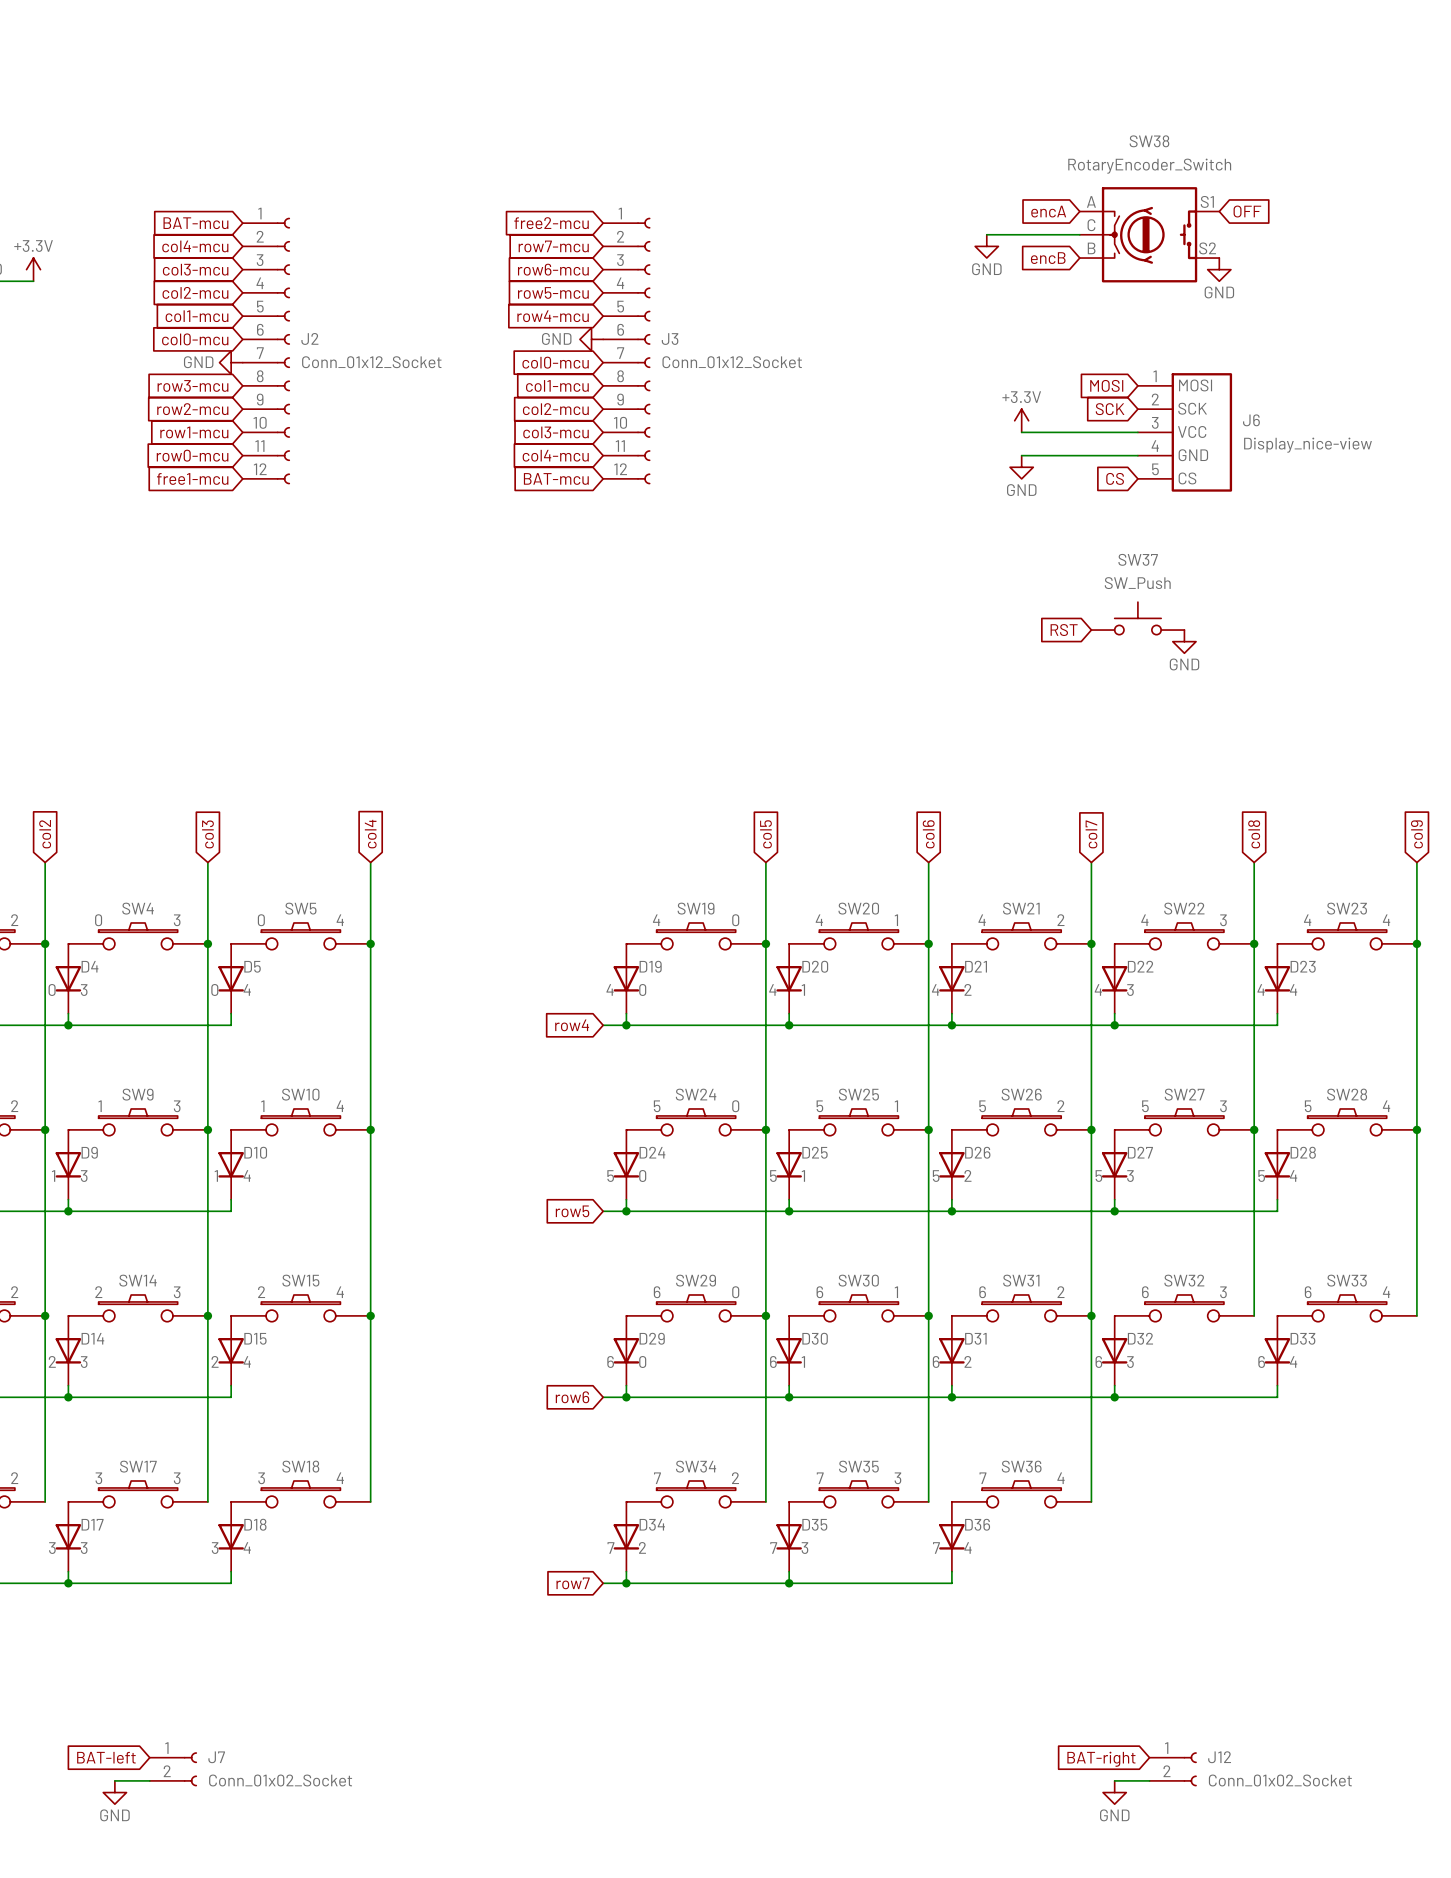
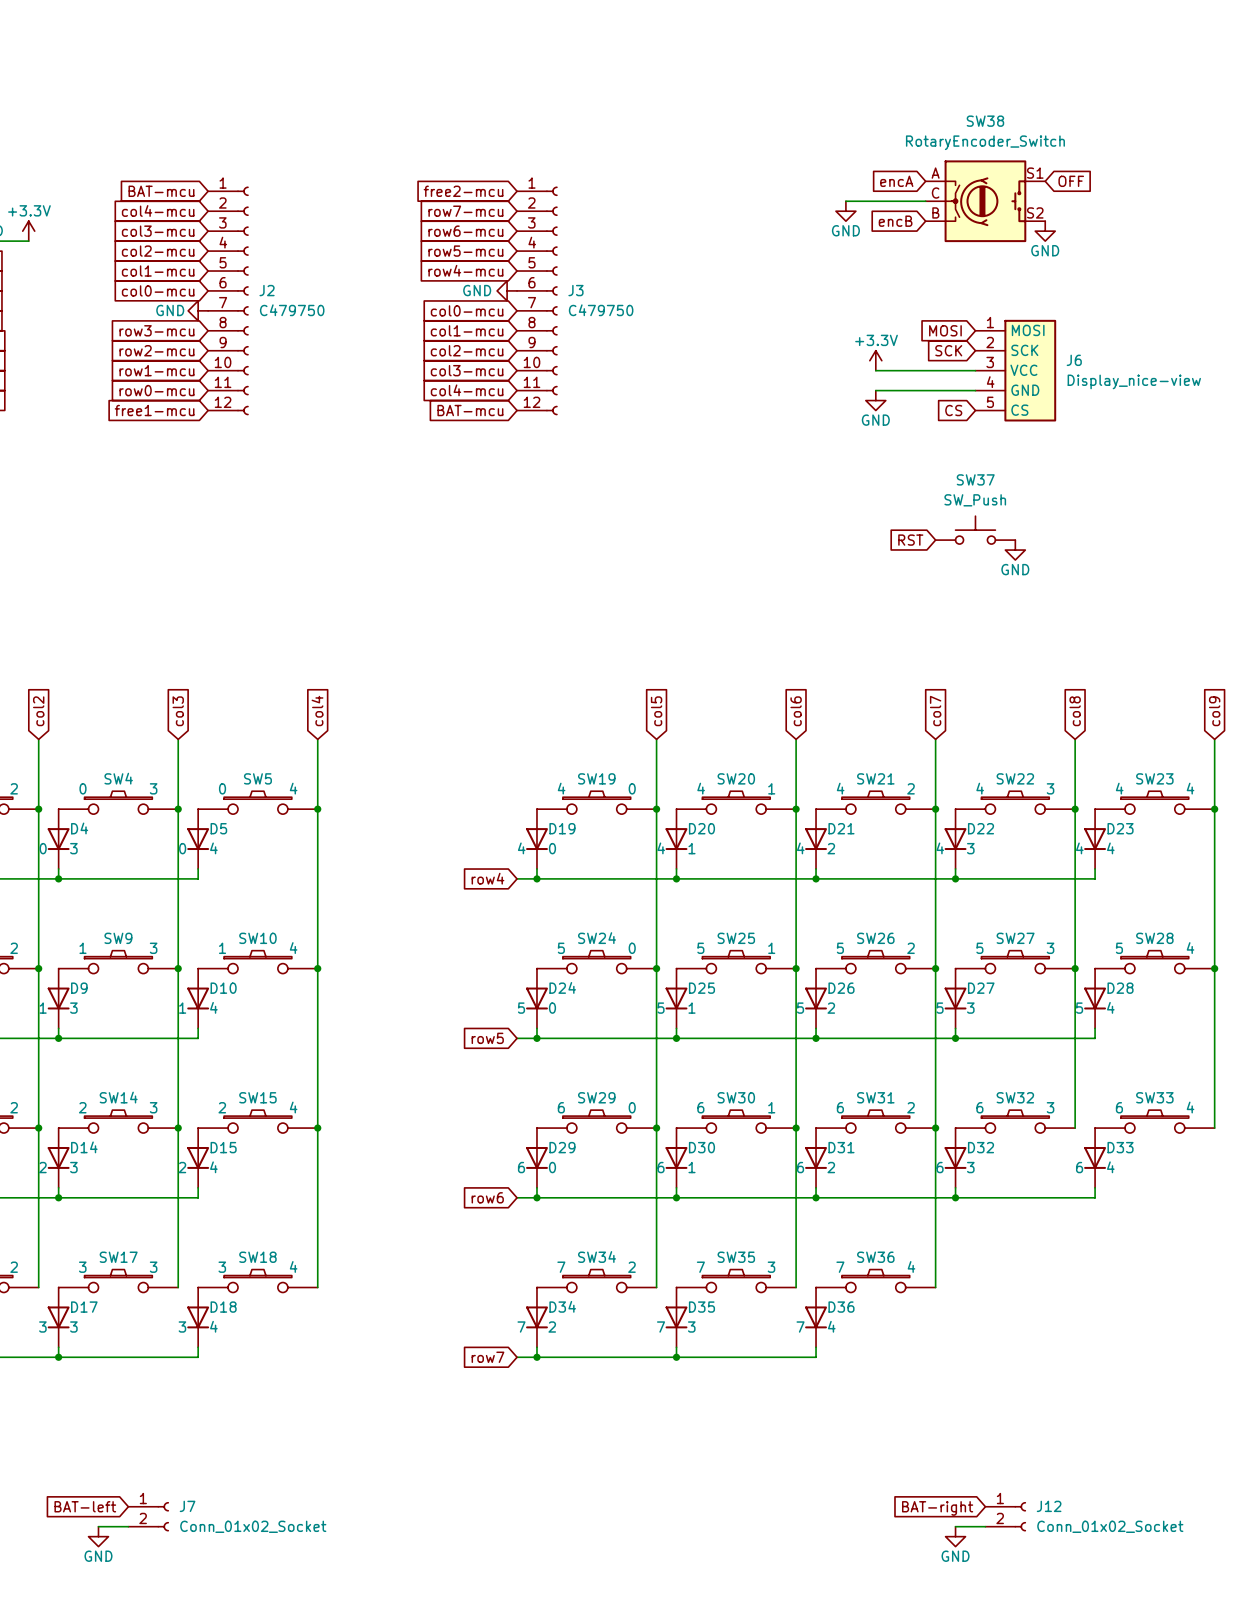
J2 value: Conn_01x12_Socket (371, 362) -> C479750 (292, 310)
J3 value: Conn_01x12_Socket (732, 362) -> C479750 (601, 310)

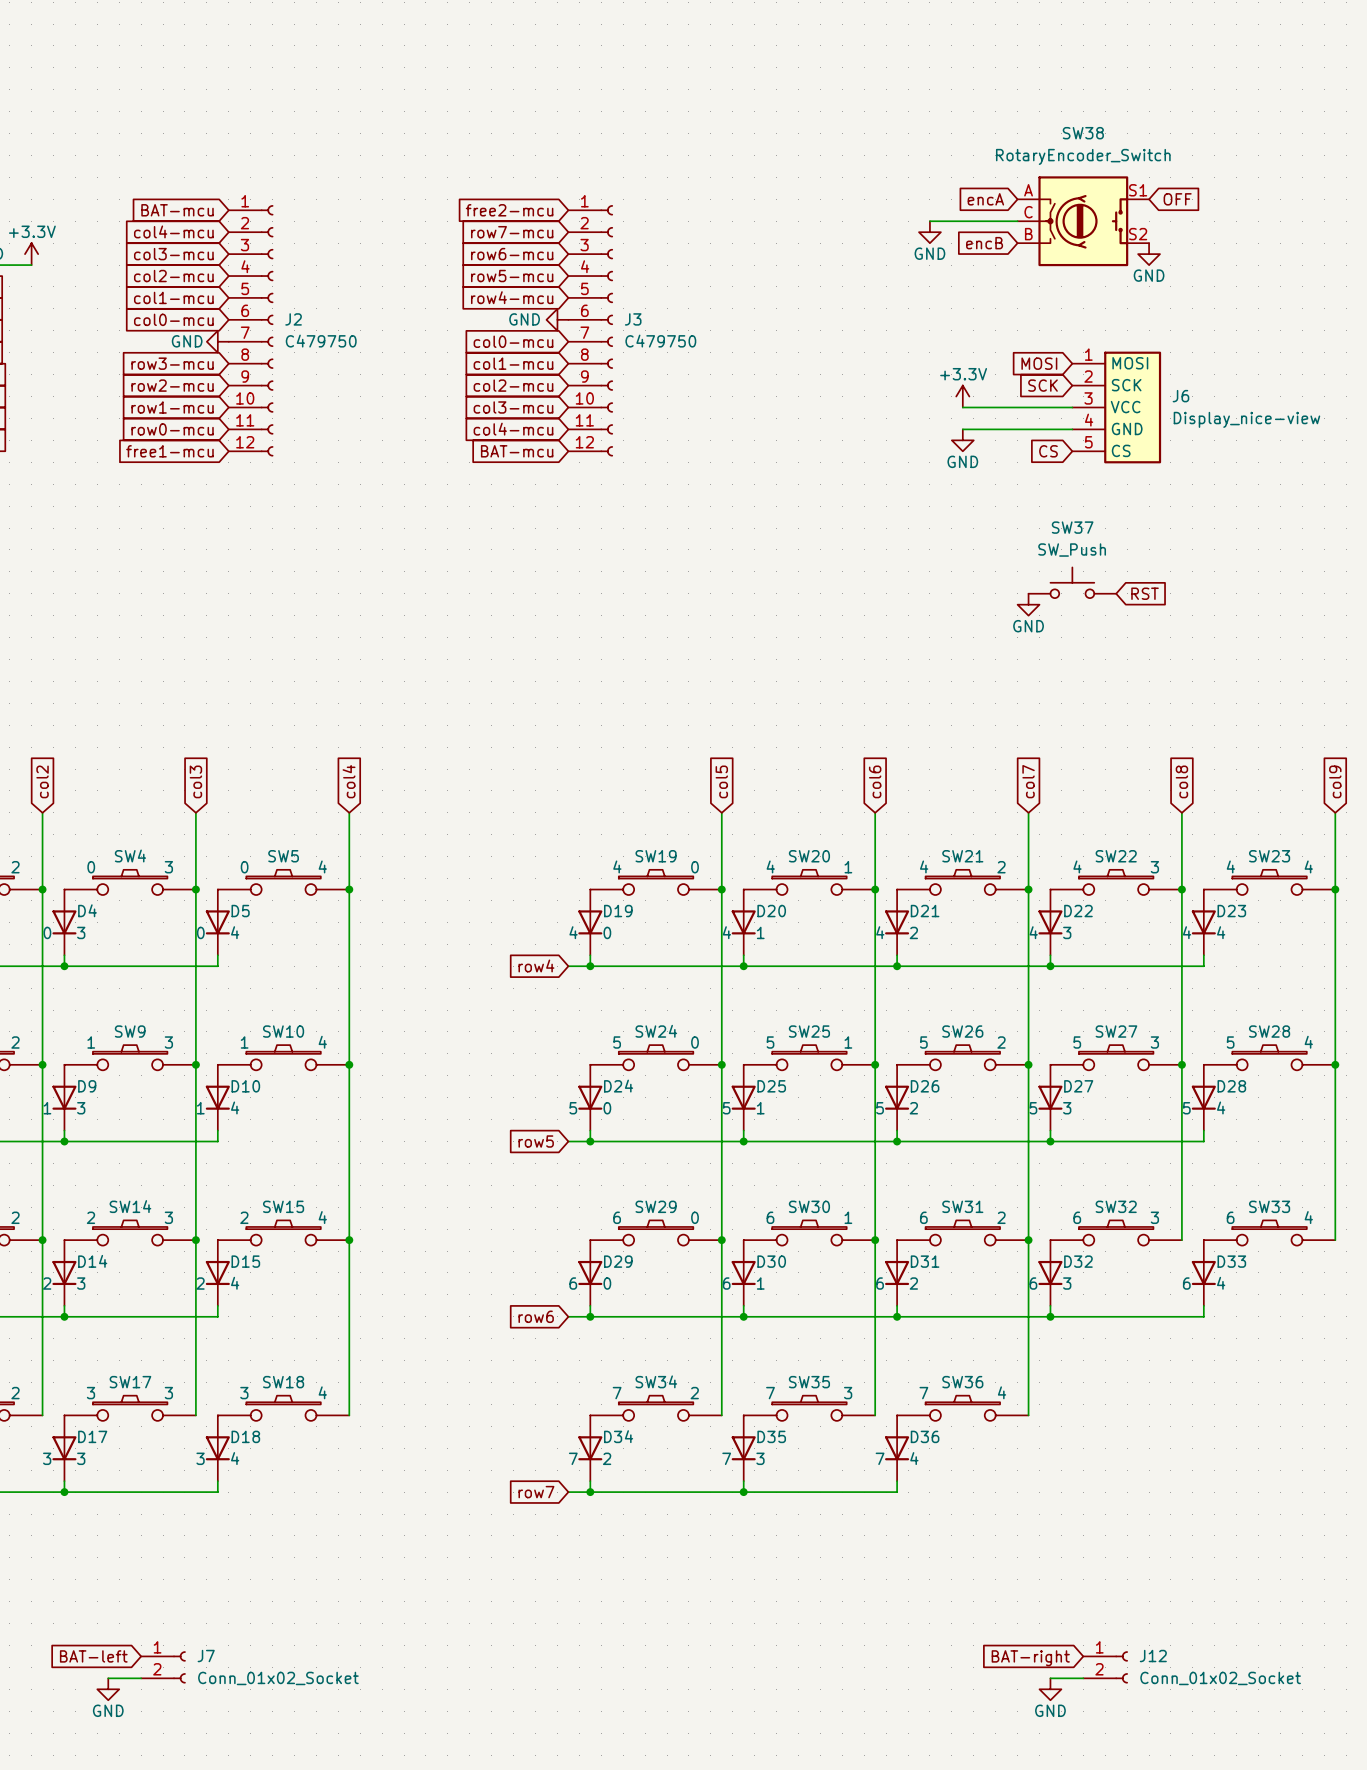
global label rotation: 0° (910, 540) -> 180° (1145, 593)
global label position: RST (910, 540) -> RST (1145, 593)
power symbol position: GND (1015, 550) -> GND (1028, 604)

